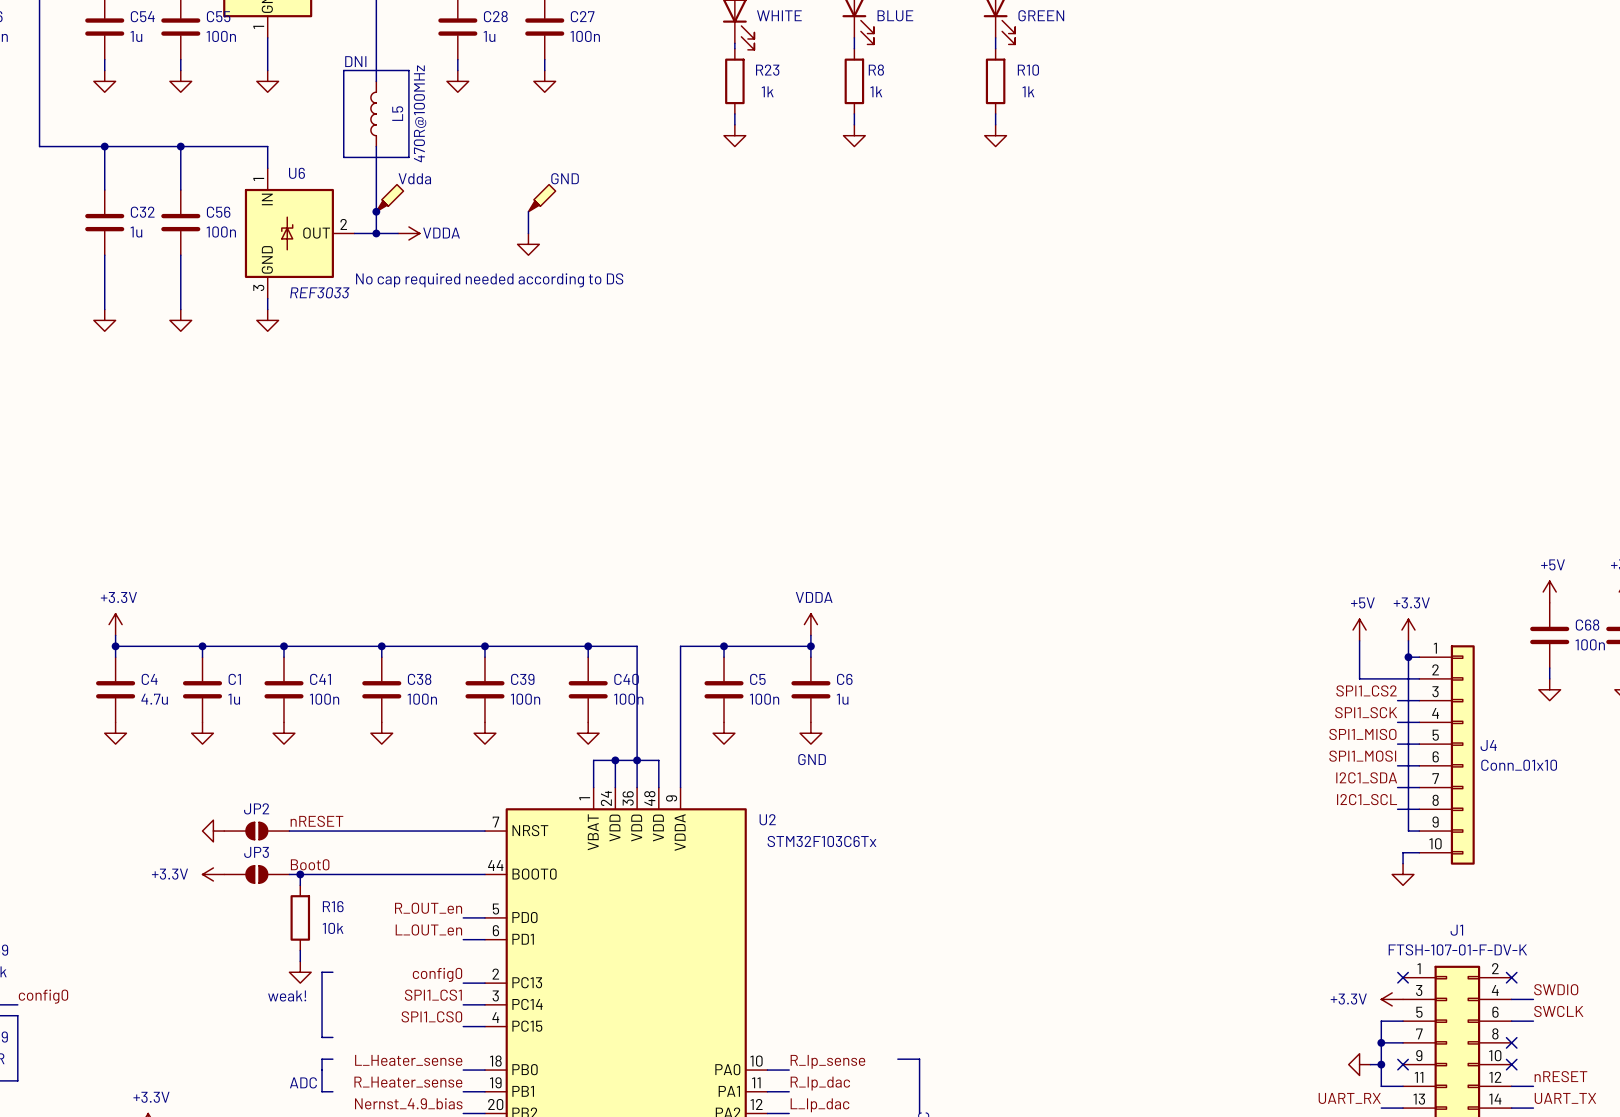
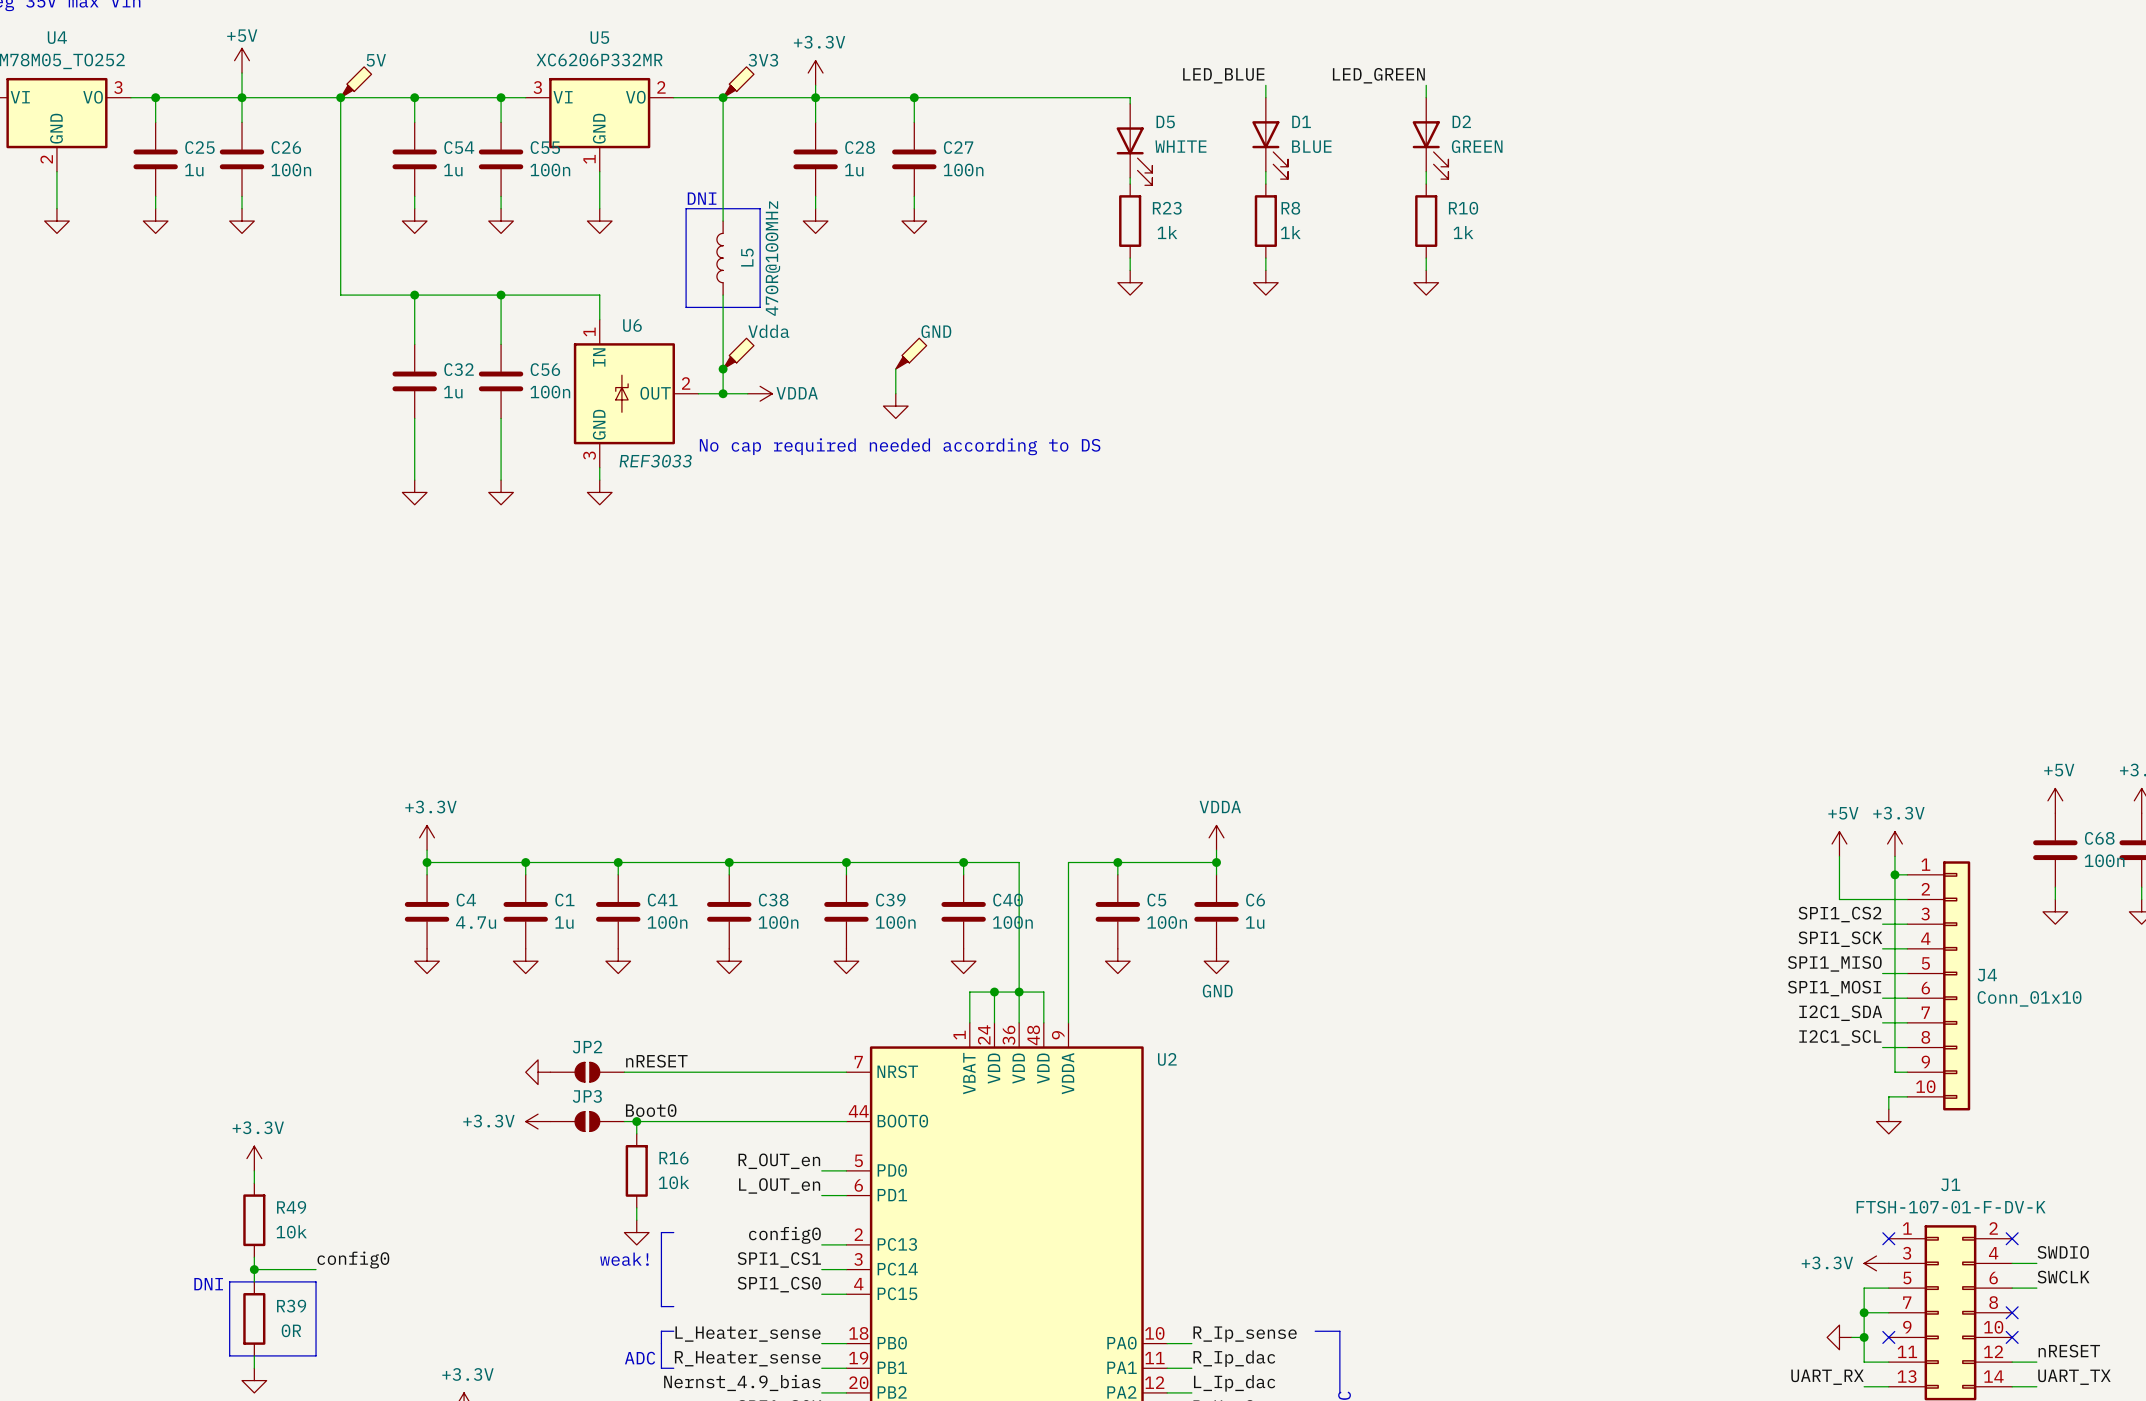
U2 value: STM32F103C6Tx (821, 841) -> none

